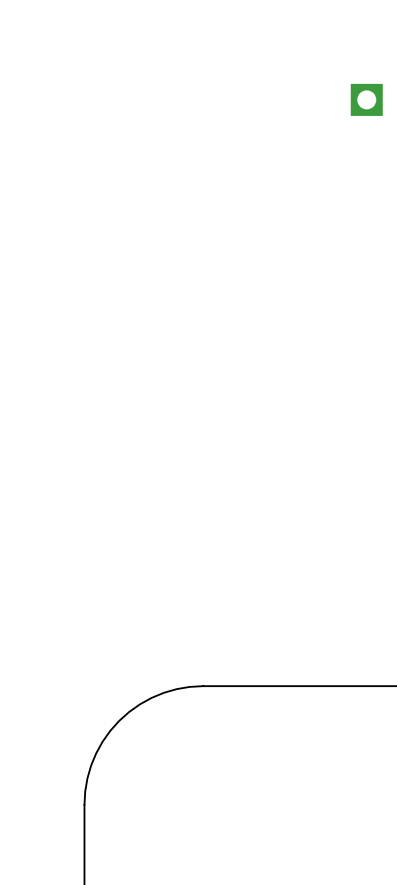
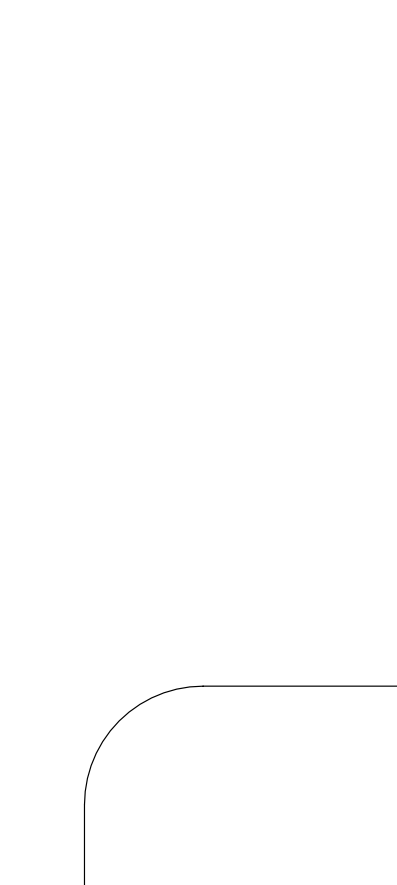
part: (366, 99) -> none

